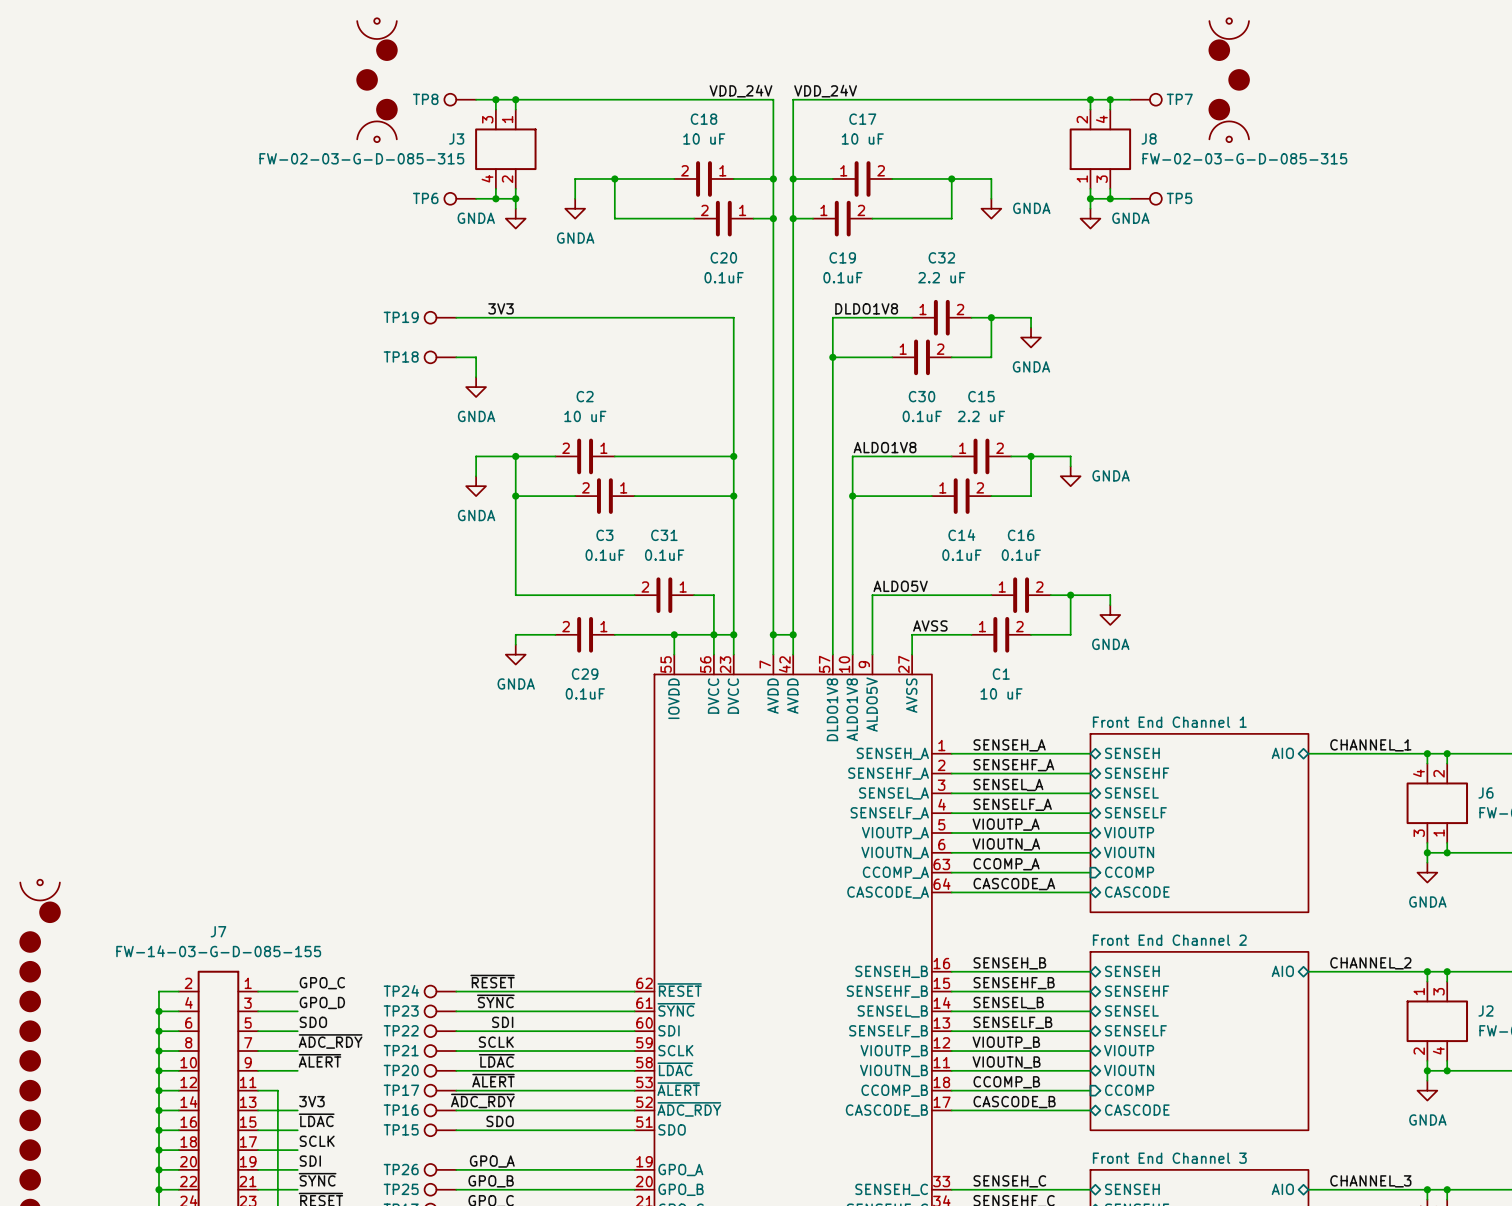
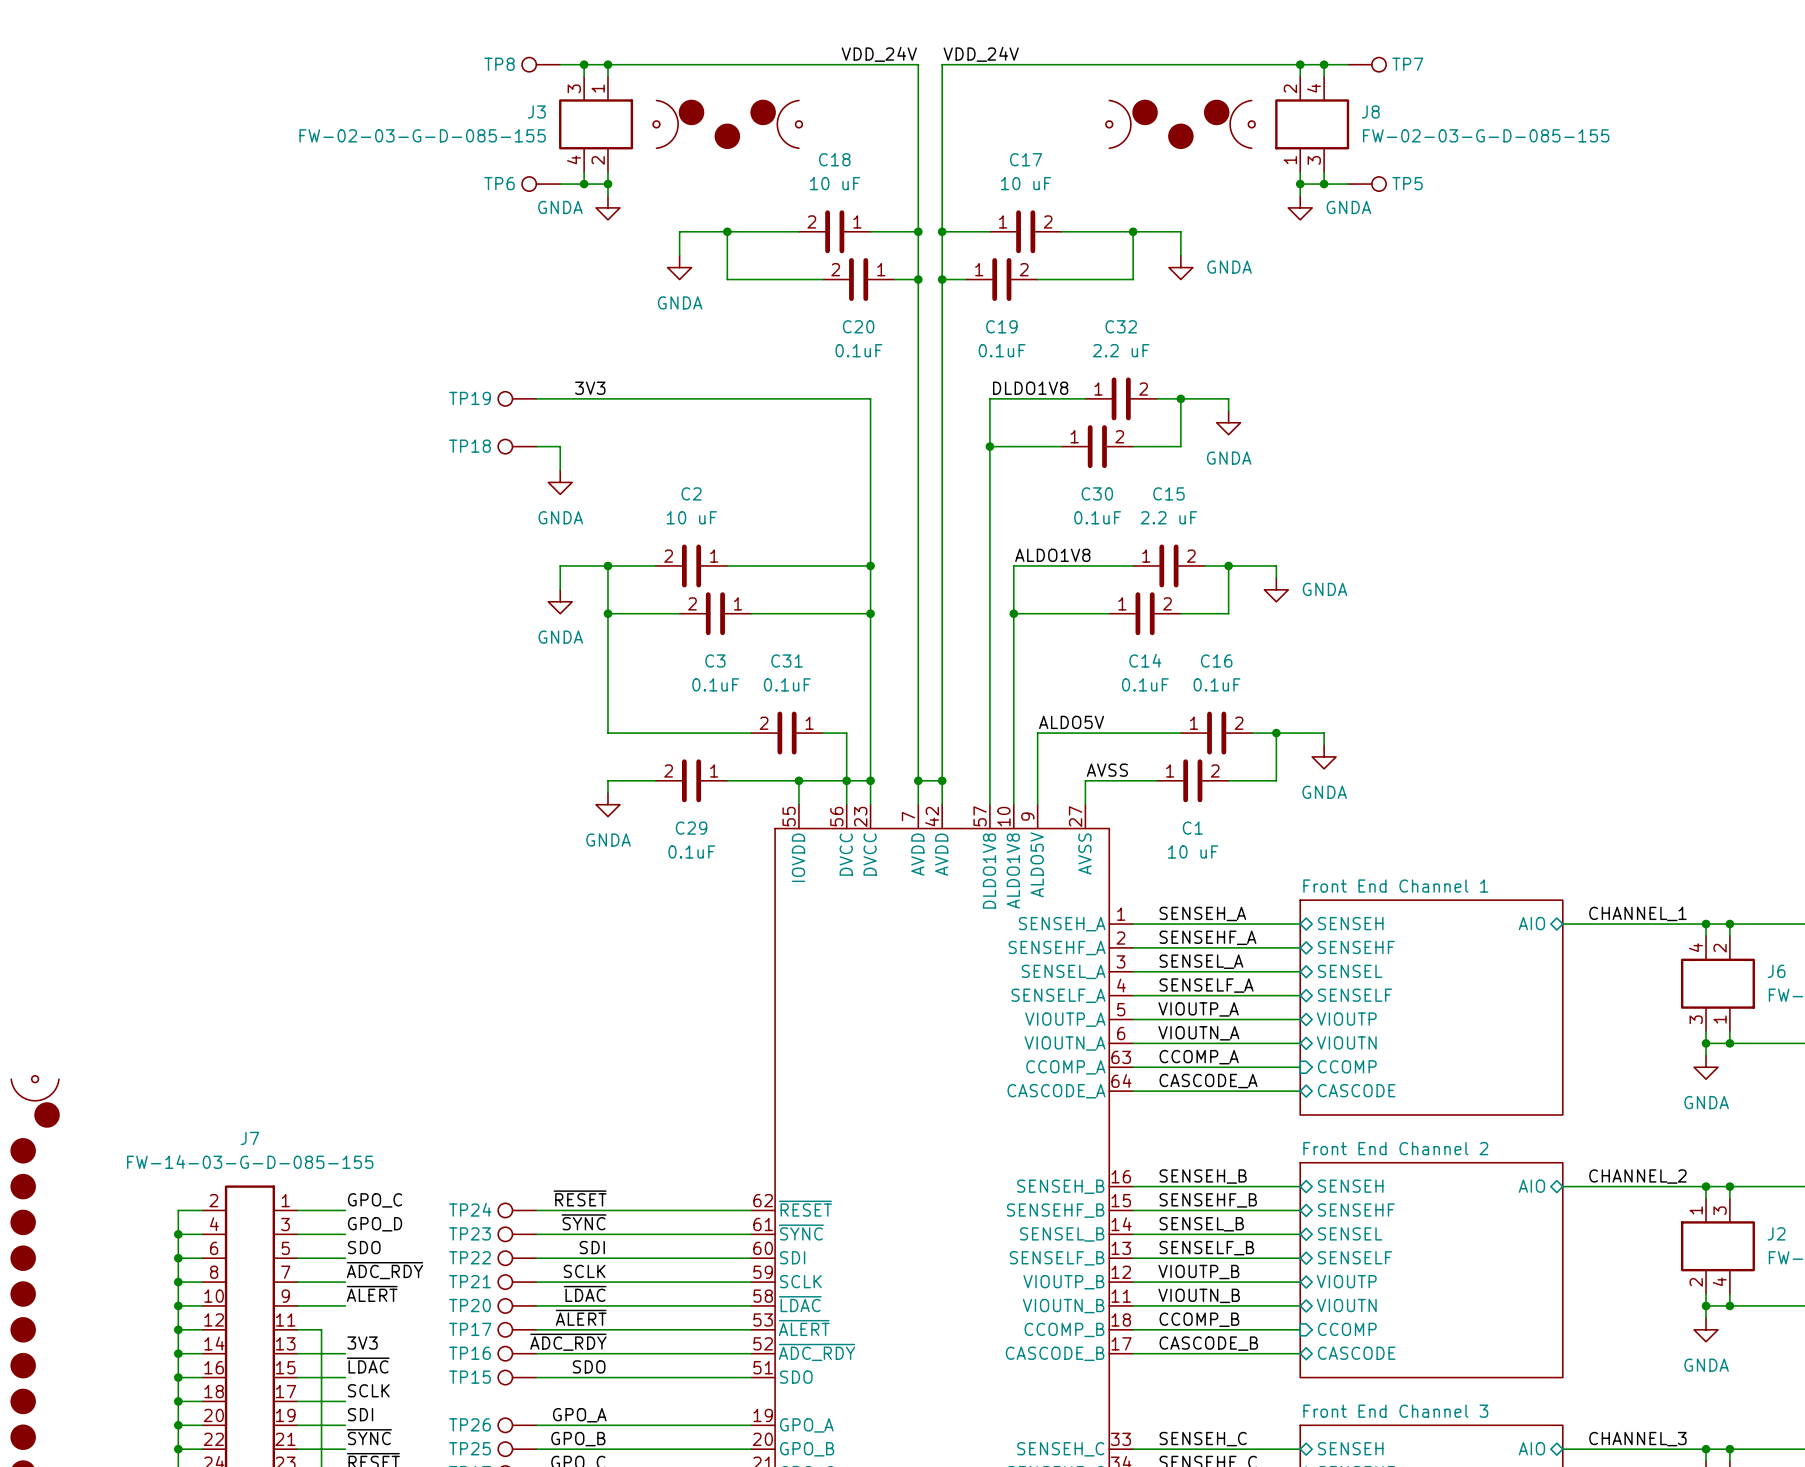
label: none -> VDD_24V (879, 54)
label: none -> VDD_24V (981, 54)
junction: none -> (584, 64)
junction: none -> (607, 64)
junction: none -> (1300, 64)
junction: none -> (1324, 64)
part: (377, 80) -> none
part: (1229, 80) -> none
part: none -> (727, 124)
part: none -> (1180, 124)
label: VDD_24V (740, 91) -> none
label: VDD_24V (825, 91) -> none
TP8 position: (460, 99) -> (541, 64)
wire: (476, 99) (773, 99) -> (560, 64) (918, 64) (918, 136)
wire: (495, 99) (495, 109) -> (584, 64) (584, 76)
junction: (495, 99) -> none
wire: (515, 99) (515, 109) -> (607, 64) (607, 76)
junction: (515, 99) -> none
wire: (793, 99) (1130, 99) -> (942, 136) (942, 64) (1347, 64)
wire: (1090, 99) (1090, 109) -> (1300, 64) (1300, 76)
junction: (1090, 99) -> none
wire: (1110, 99) (1110, 109) -> (1324, 64) (1324, 76)
junction: (1110, 99) -> none
TP7 position: (1145, 99) -> (1367, 64)
junction: none -> (584, 184)
junction: none -> (607, 184)
junction: none -> (1300, 184)
junction: none -> (1324, 184)
J3 position: (505, 149) -> (596, 124)
J8 position: (1100, 149) -> (1312, 124)
J3 value: FW-02-03-G-D-085-315 (361, 158) -> FW-02-03-G-D-085-155 (422, 135)
J8 value: FW-02-03-G-D-085-315 (1244, 158) -> FW-02-03-G-D-085-155 (1486, 135)
wire: (495, 188) (495, 198) -> (584, 172) (584, 184)
wire: (515, 188) (515, 208) -> (607, 172) (607, 195)
wire: (1090, 188) (1090, 208) -> (1300, 172) (1300, 195)
wire: (1110, 188) (1110, 198) -> (1324, 172) (1324, 184)
TP6 position: (460, 198) -> (541, 184)
wire: (476, 198) (515, 198) -> (560, 184) (607, 184)
junction: (495, 198) -> none
junction: (515, 198) -> none
wire: (1090, 198) (1130, 198) -> (1300, 184) (1347, 184)
junction: (1090, 198) -> none
junction: (1110, 198) -> none
TP5 position: (1145, 198) -> (1367, 184)
power symbol position: GNDA (515, 218) -> GNDA (607, 207)
power symbol position: GNDA (1090, 218) -> GNDA (1300, 207)

